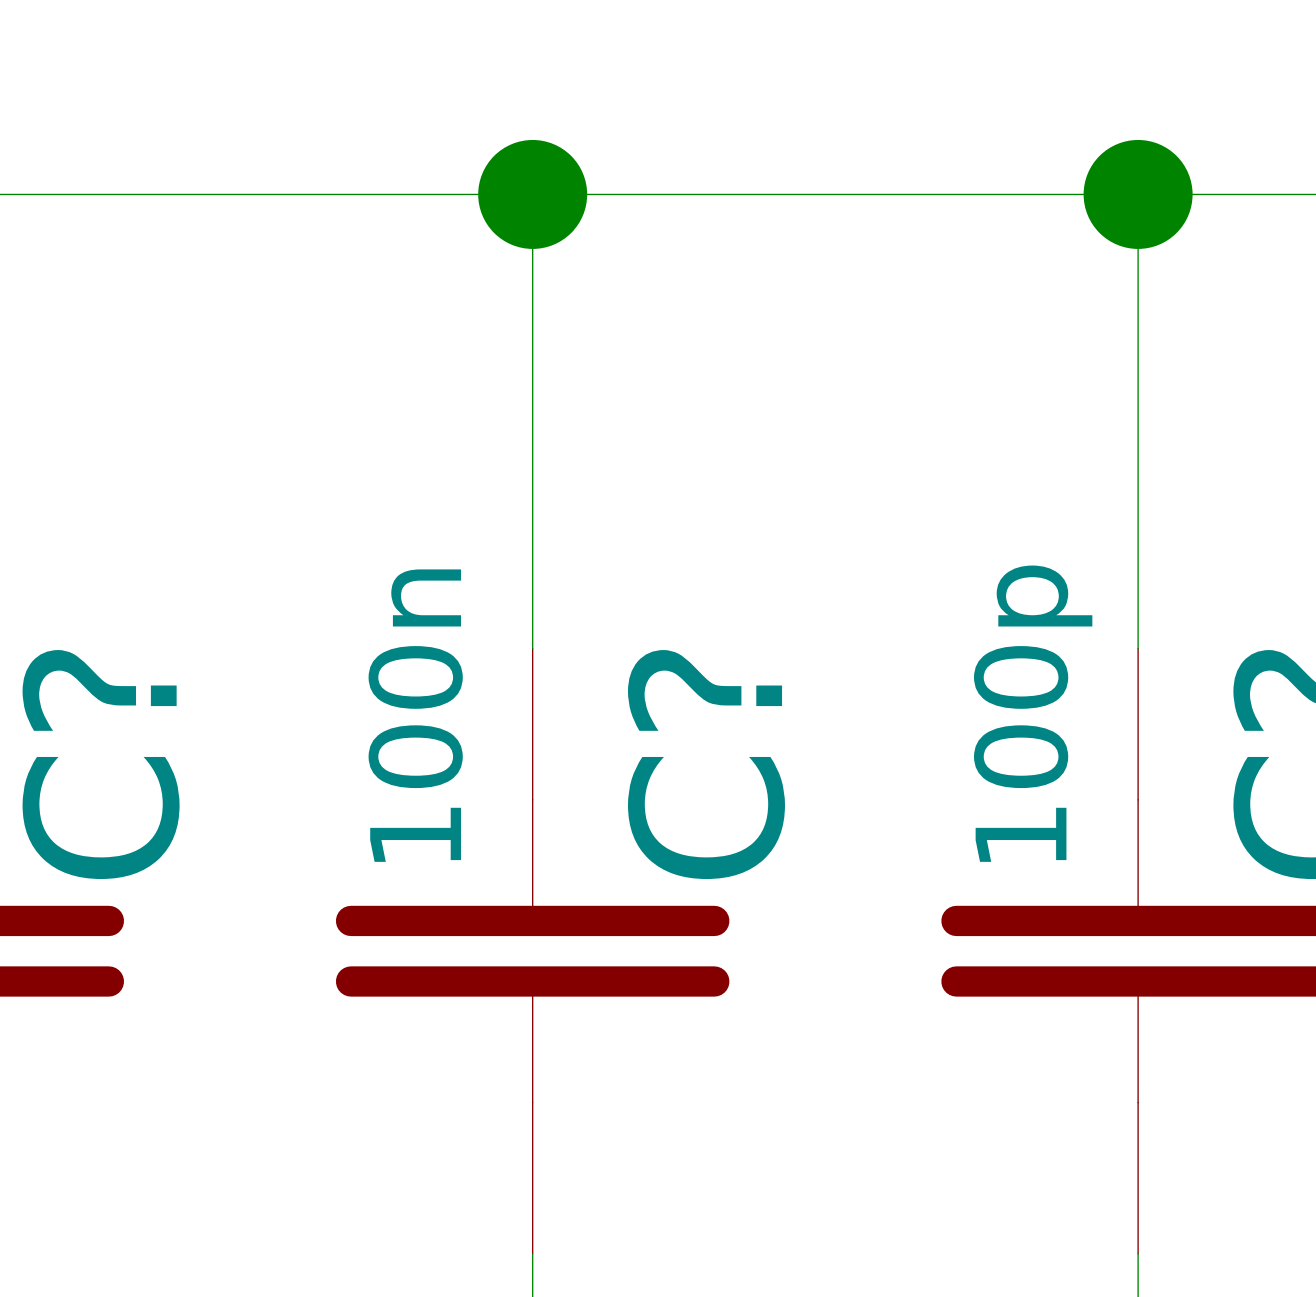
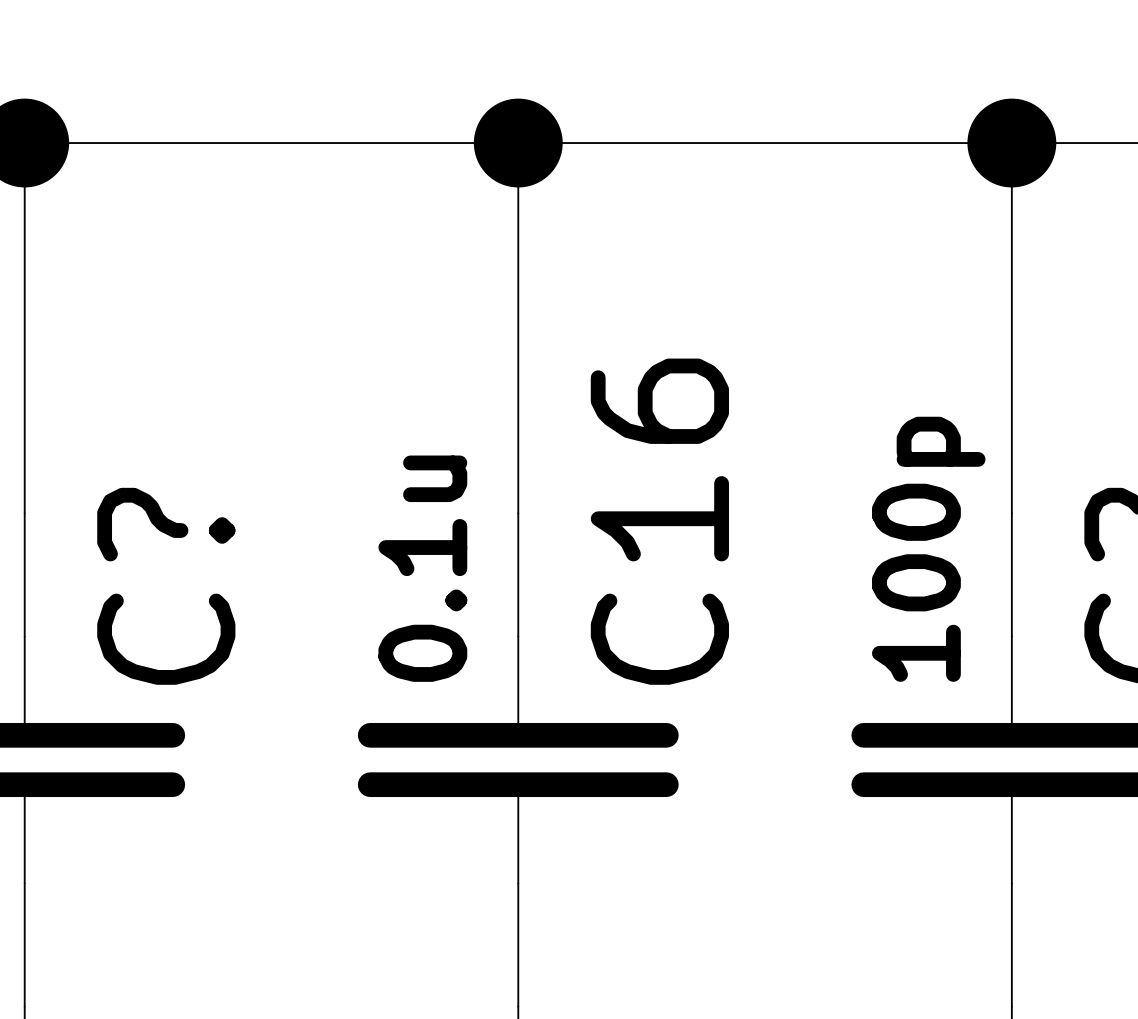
C? value: 100n (415, 715) -> 0.1u (422, 568)
C? name: C? (706, 764) -> C16 (659, 521)

